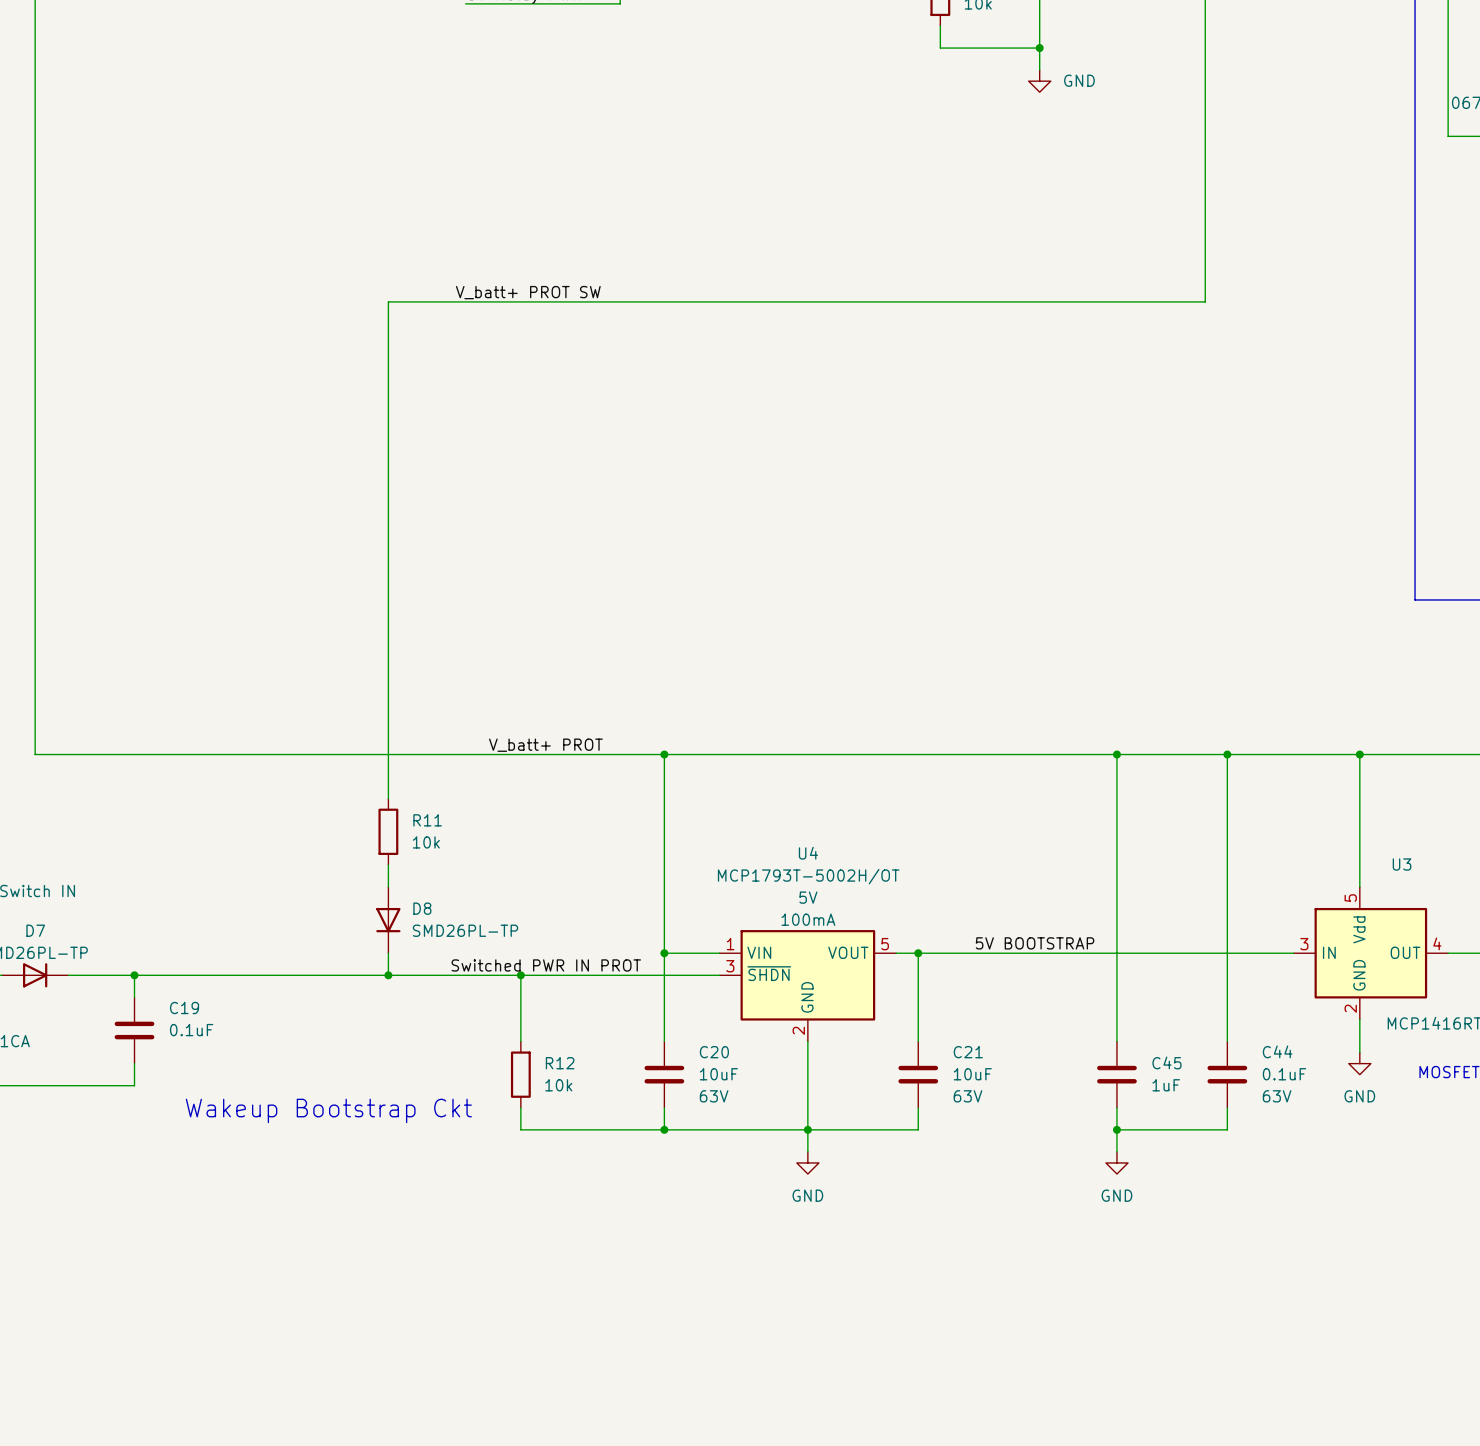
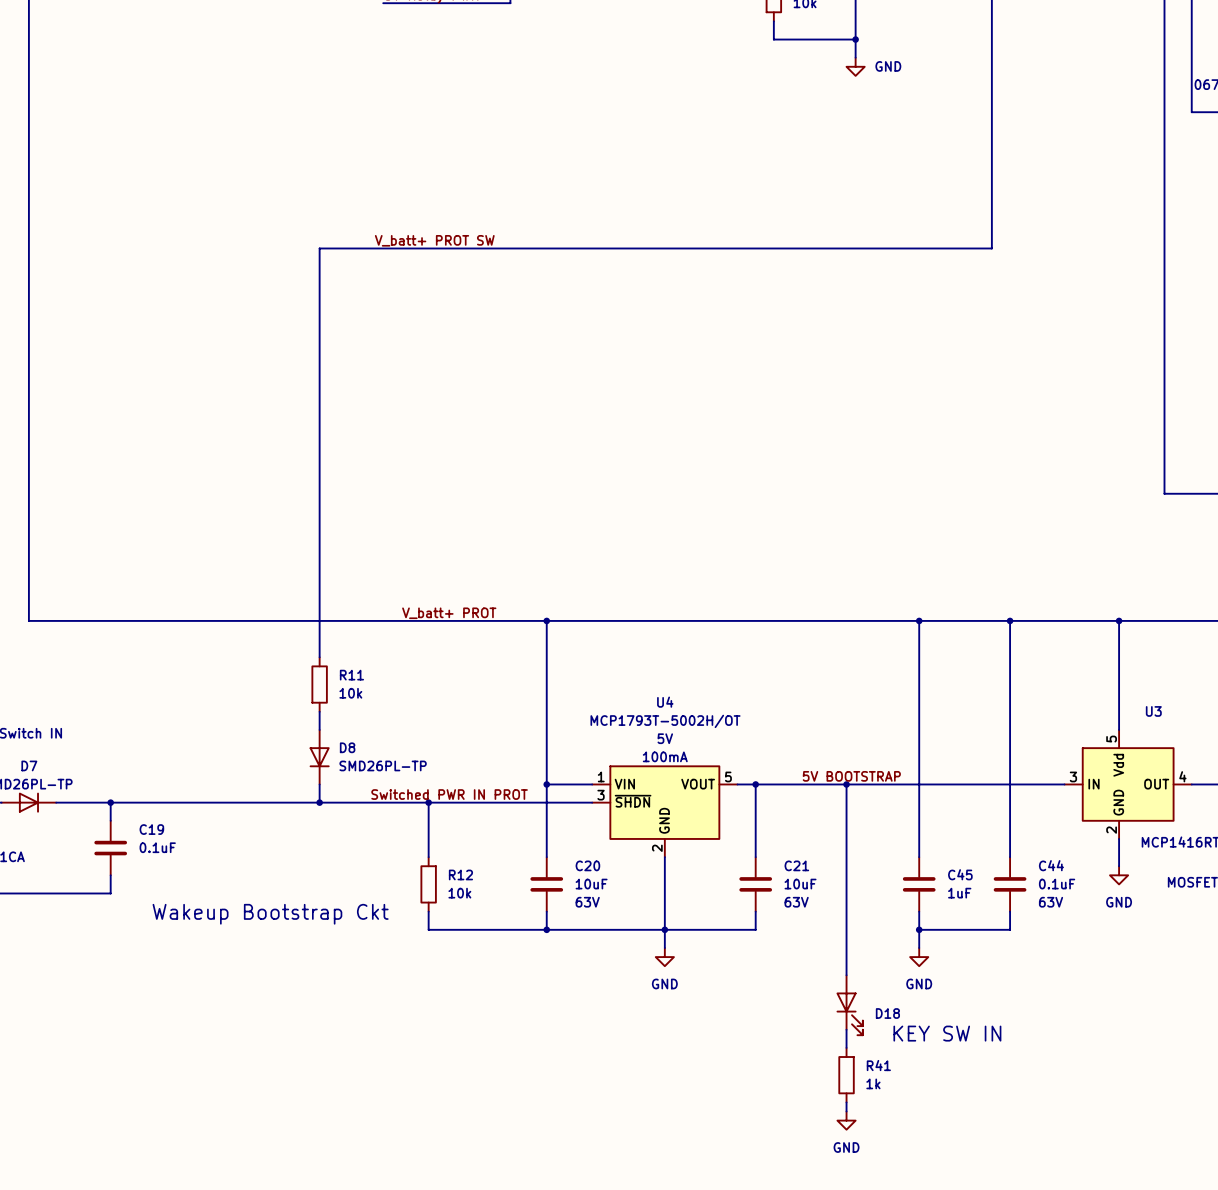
wire: none -> (846, 784) (846, 975)
junction: none -> (846, 784)
D18: none -> (849, 1005)
wire: none -> (846, 1029) (846, 1047)
text: none -> KEY SW IN (947, 1033)
R41: none -> 1k (846, 1075)
wire: none -> (846, 1102) (846, 1111)
power symbol: none -> GND (846, 1120)

